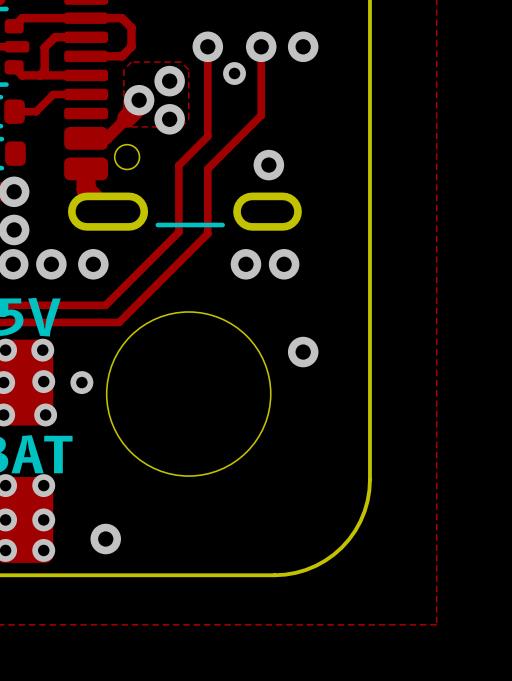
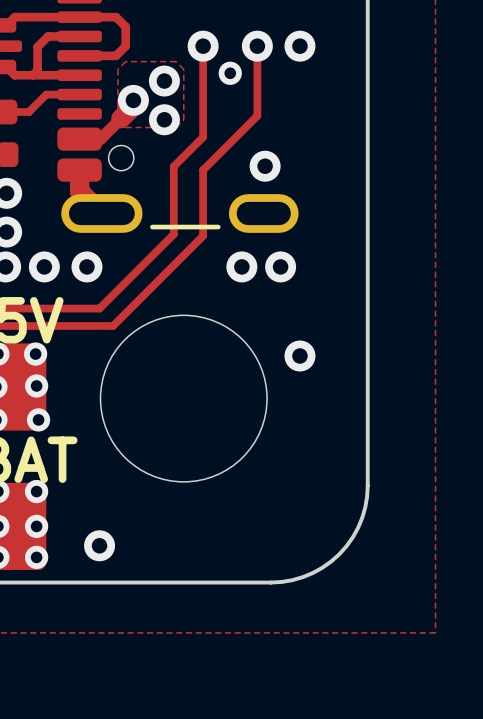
via: (81, 382) -> none

